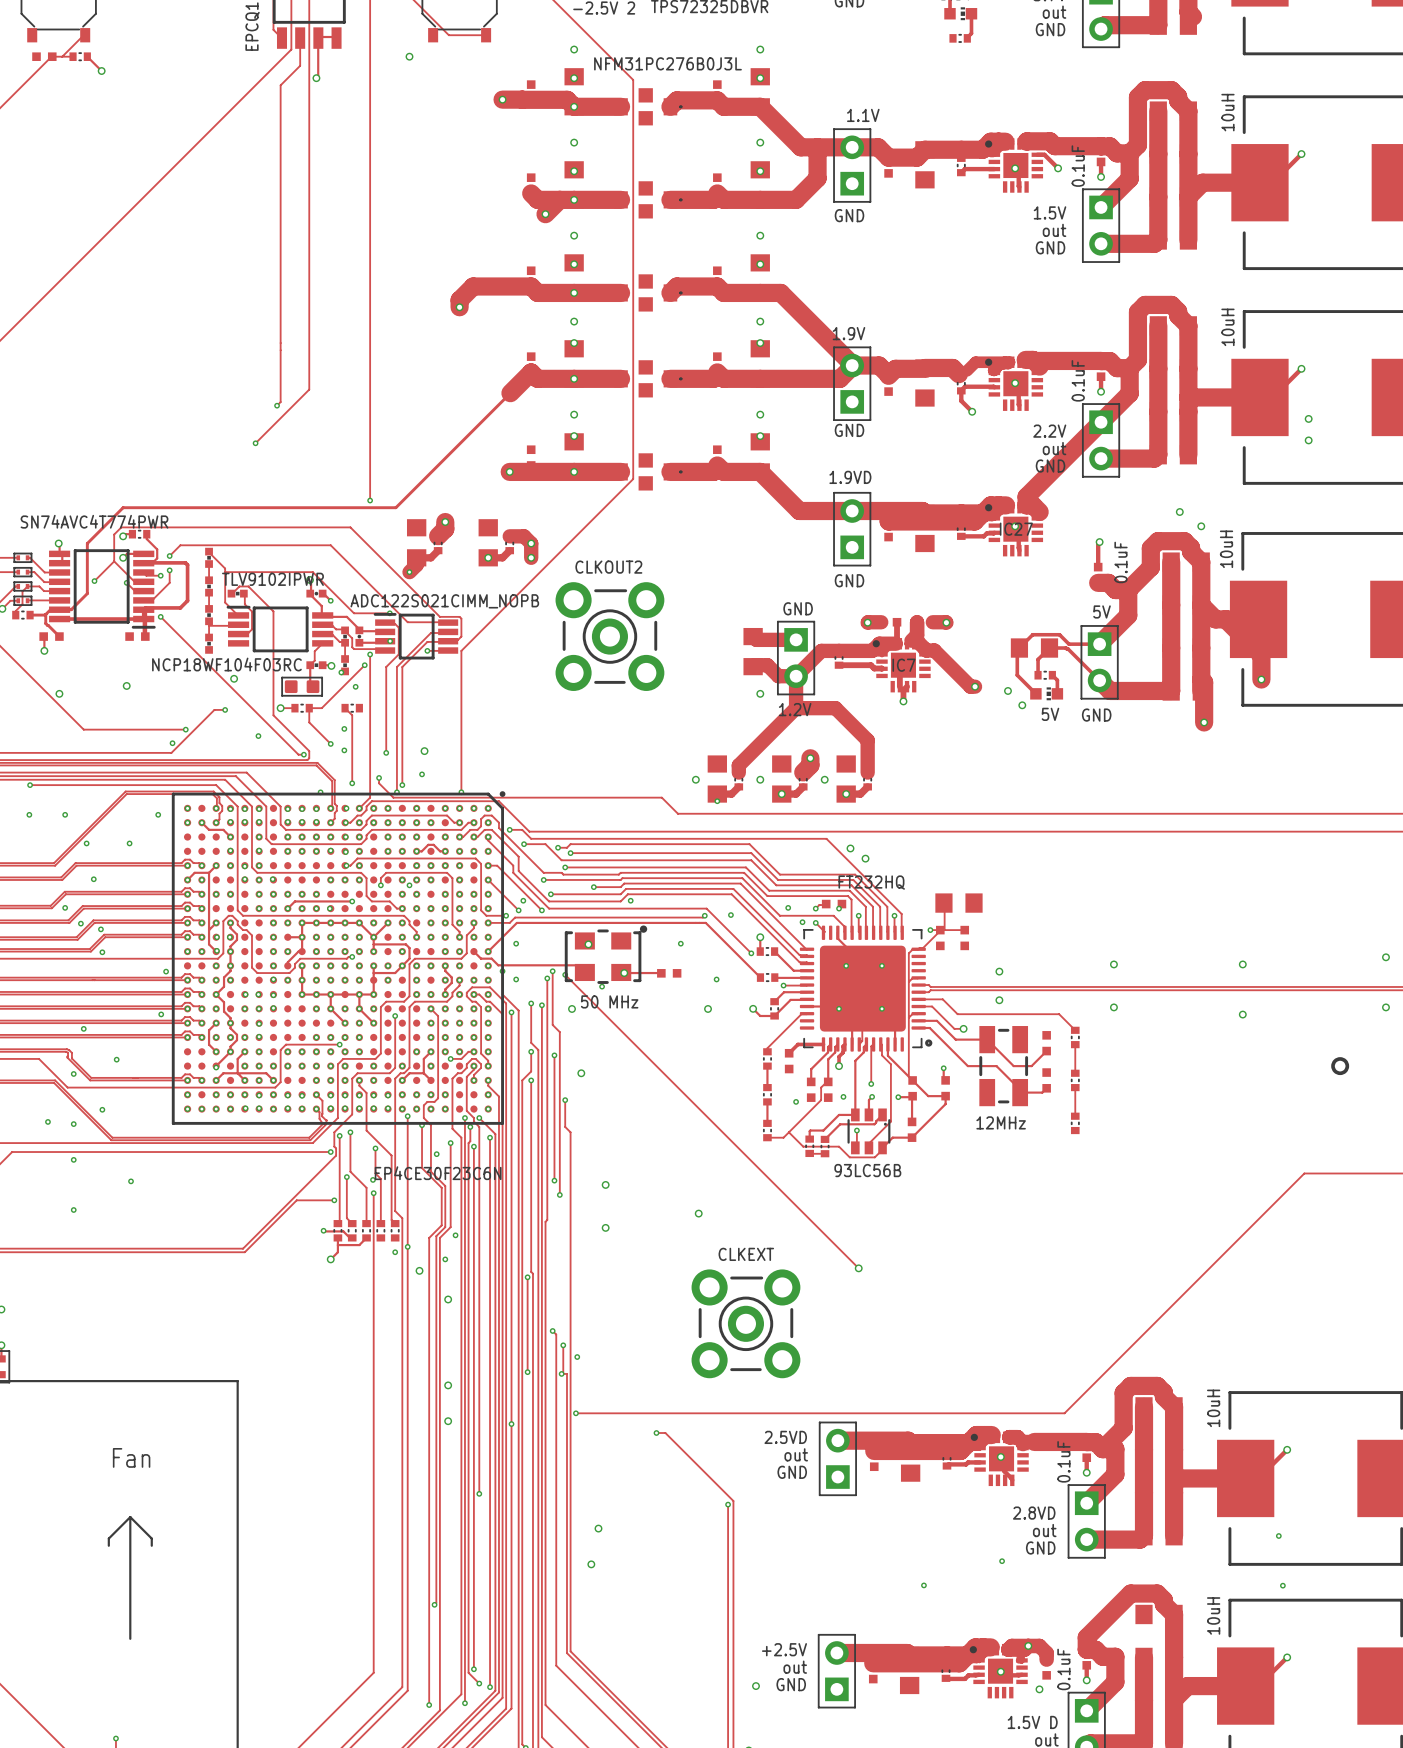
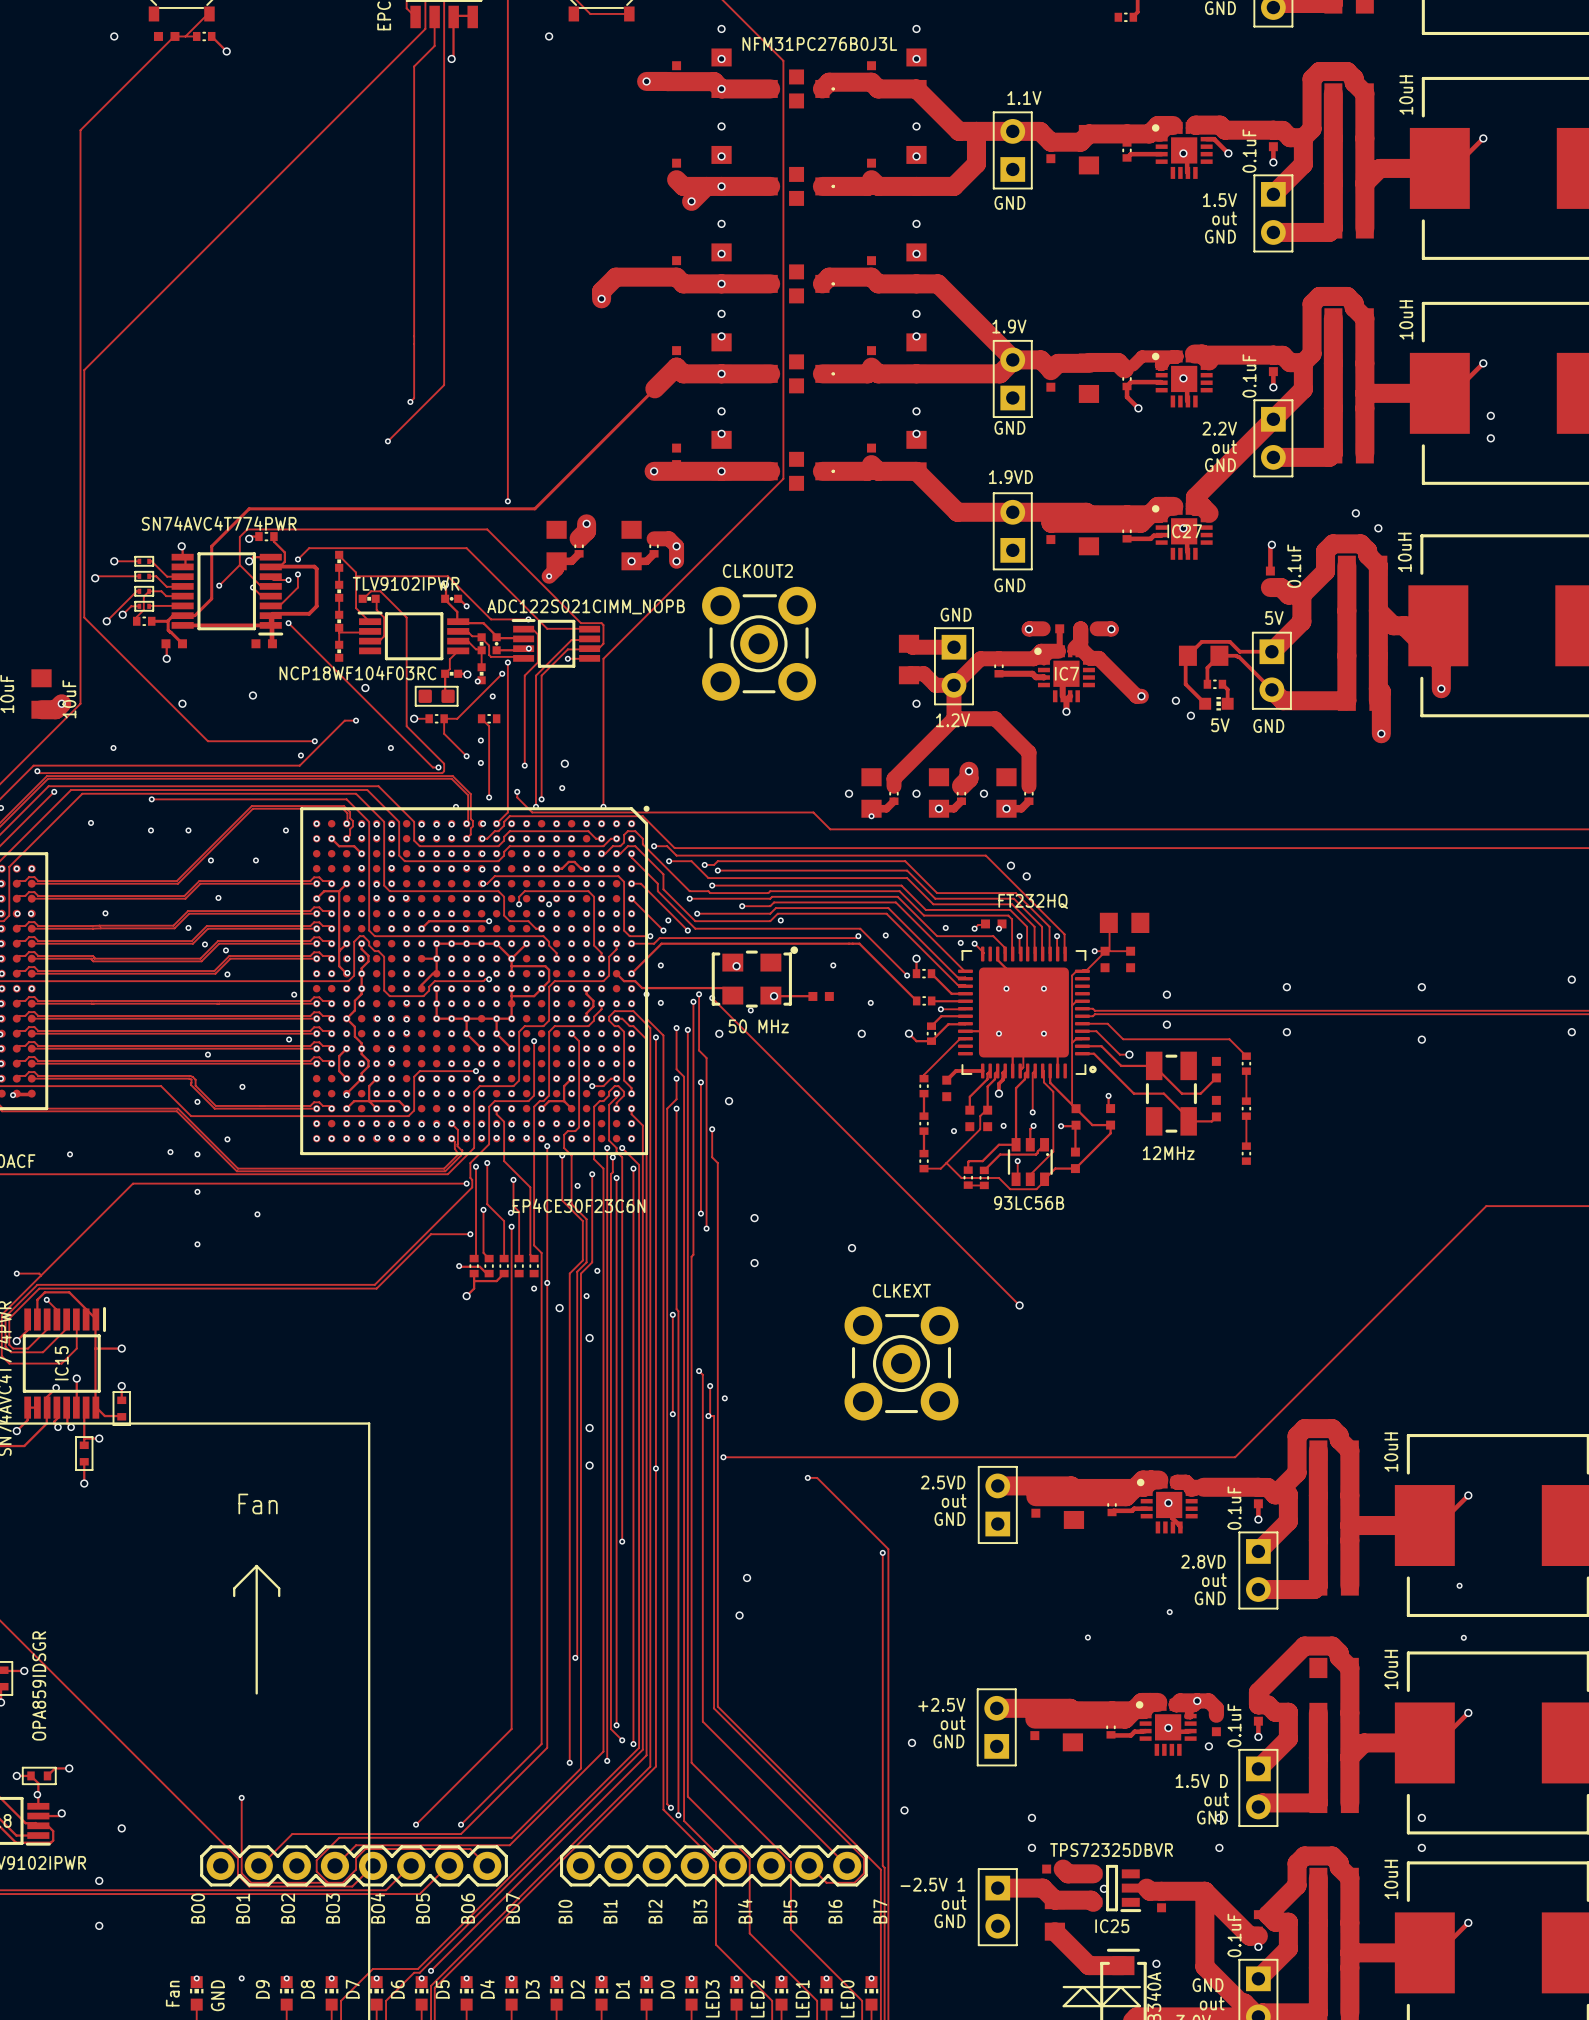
drawing: [1331, 1057, 1350, 1076] -> none

